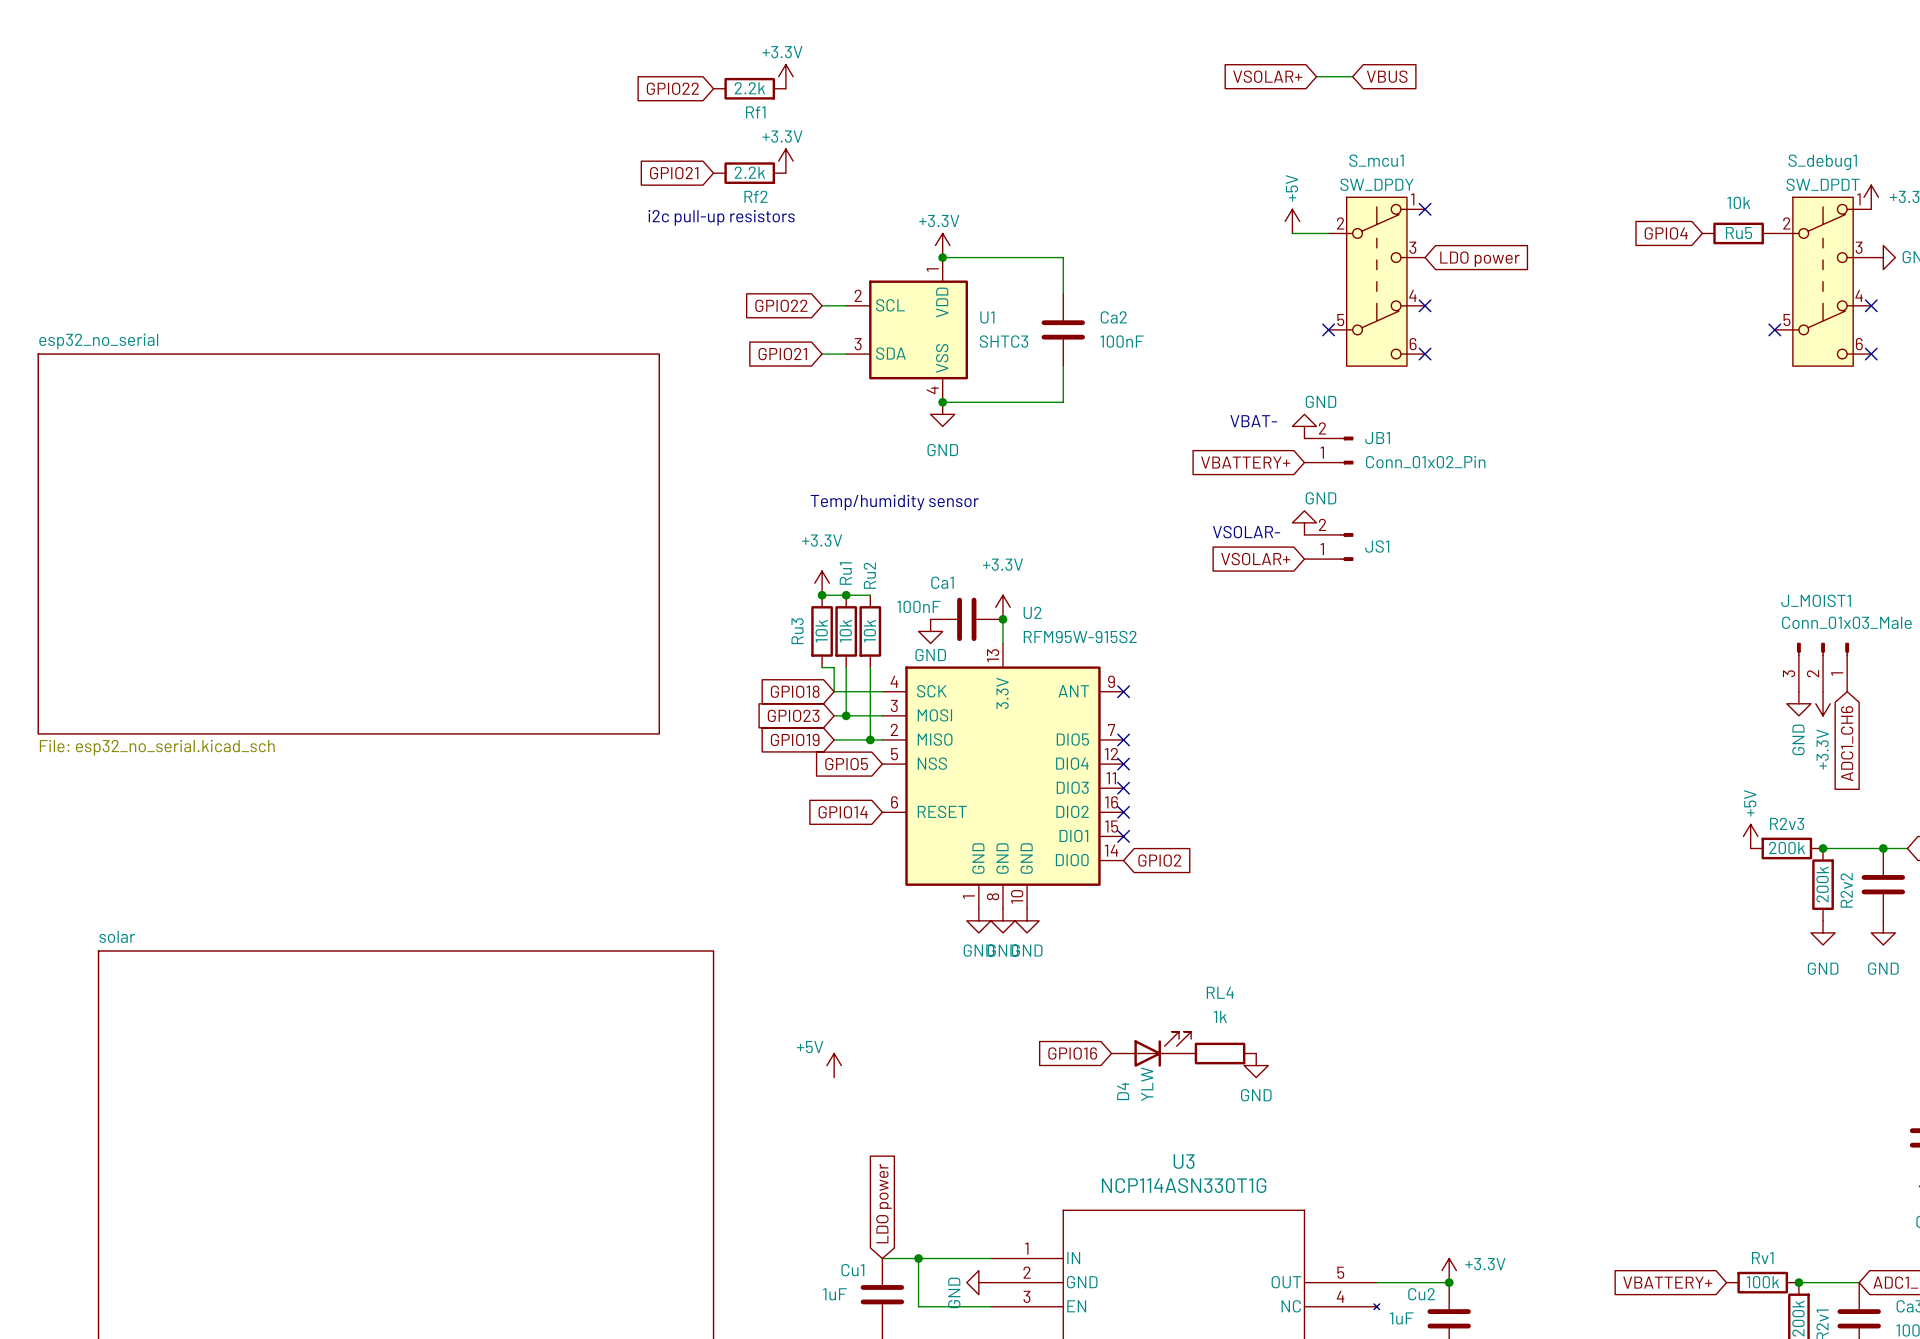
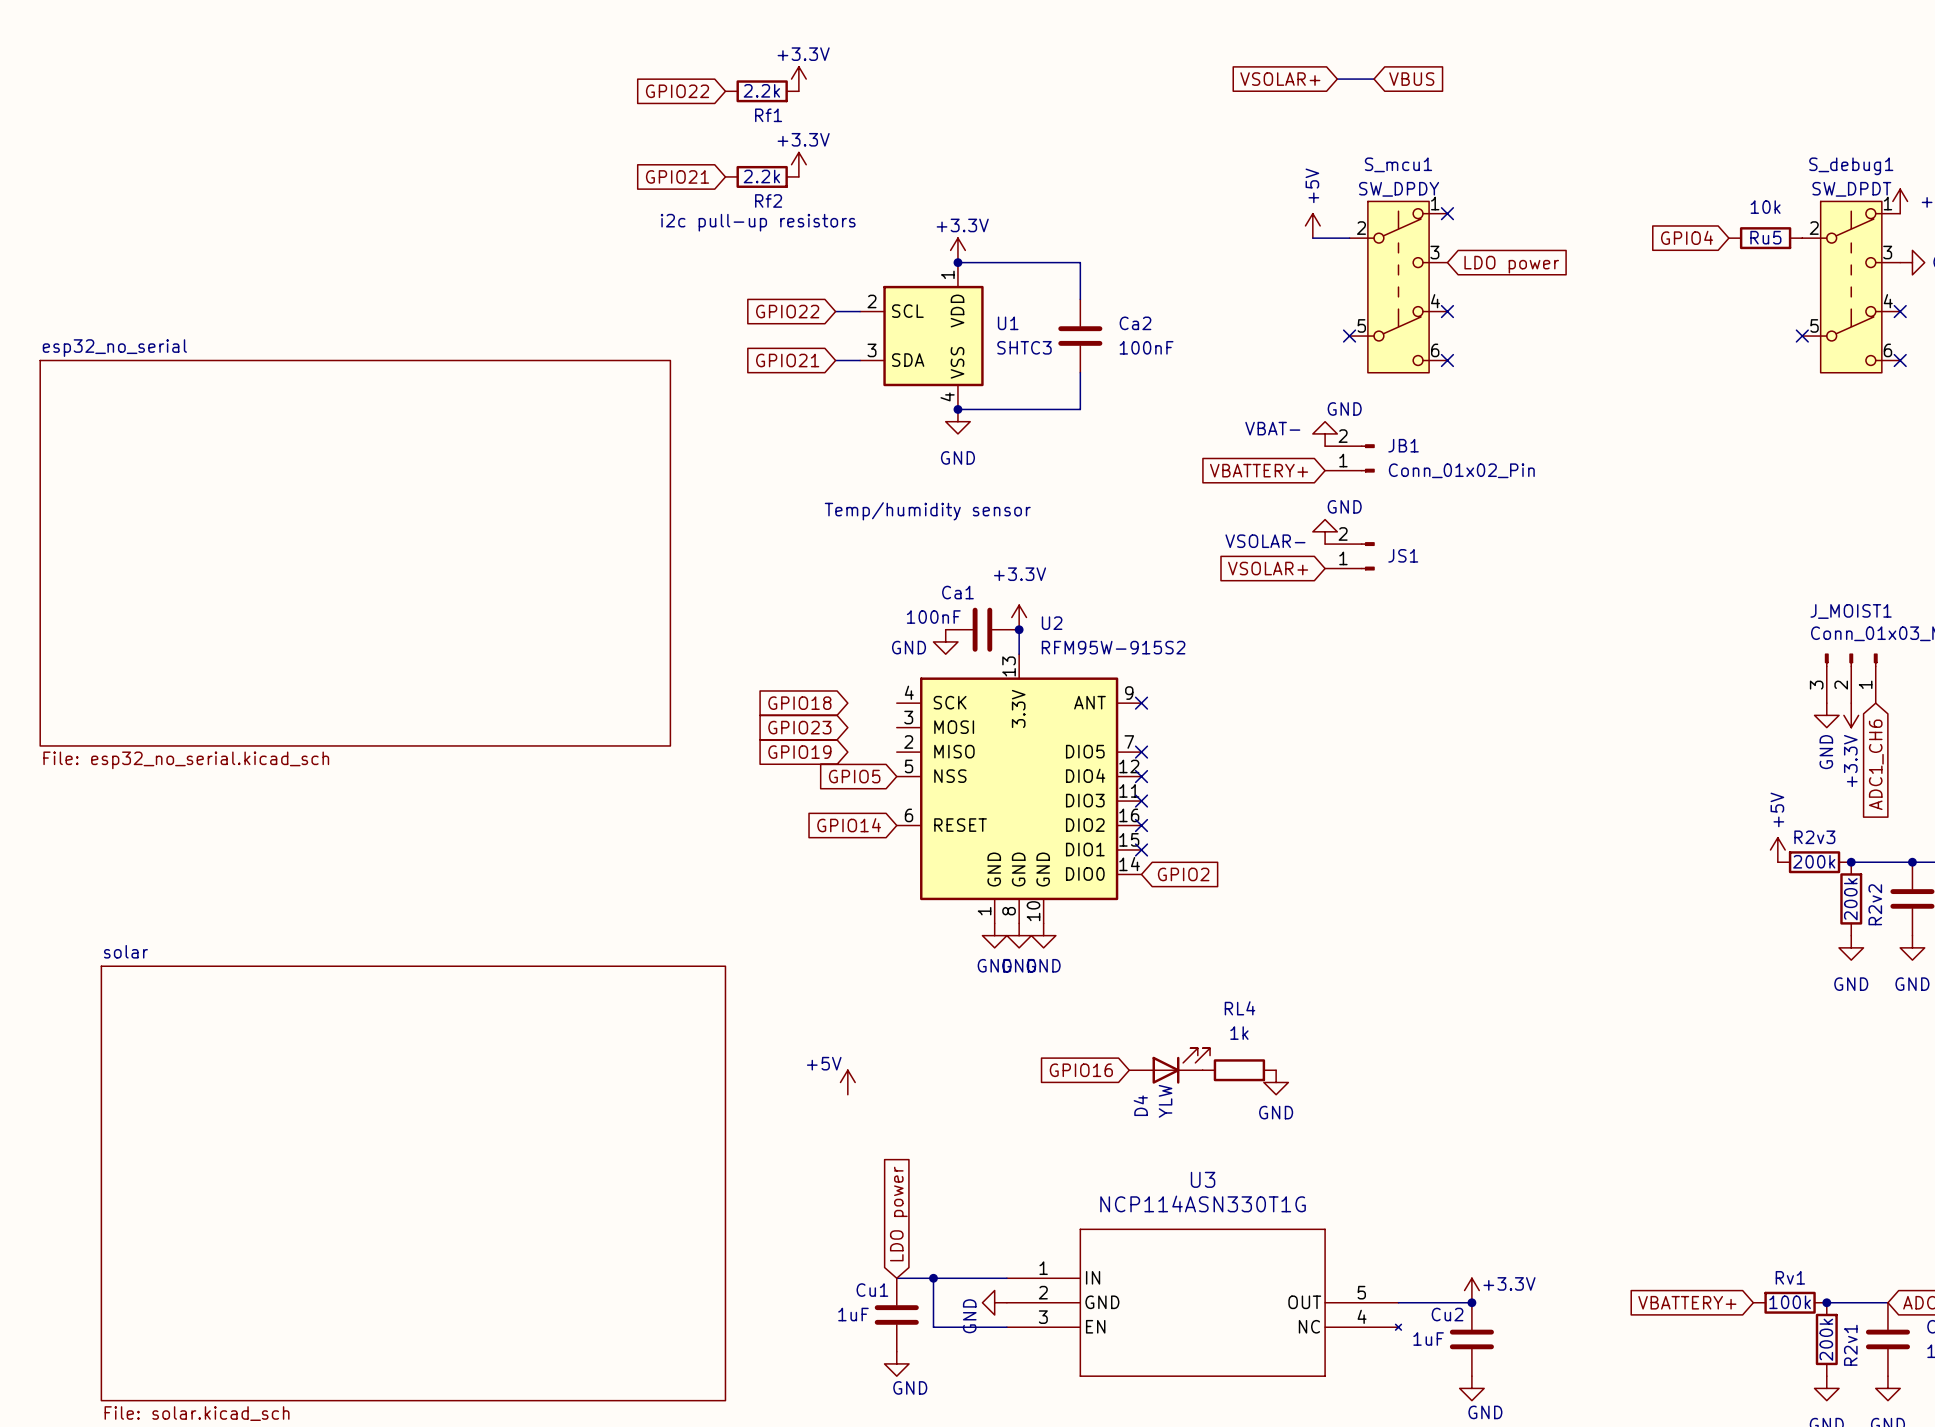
power symbol: +3.3V (822, 583) -> none
wire: (822, 595) (870, 595) -> none
junction: (822, 595) -> none
junction: (846, 595) -> none
Ru3: 10k (822, 631) -> none
Ru1: 10k (846, 631) -> none
Ru2: 10k (870, 631) -> none
power symbol text position: GND (930, 655) -> GND (909, 647)
wire: (822, 667) (834, 667) (834, 691) (882, 691) -> none
wire: (846, 667) (846, 715) -> none
wire: (870, 667) (870, 739) -> none
wire: (834, 715) (882, 715) -> none
junction: (846, 715) -> none
wire: (834, 739) (882, 739) -> none
junction: (870, 739) -> none

